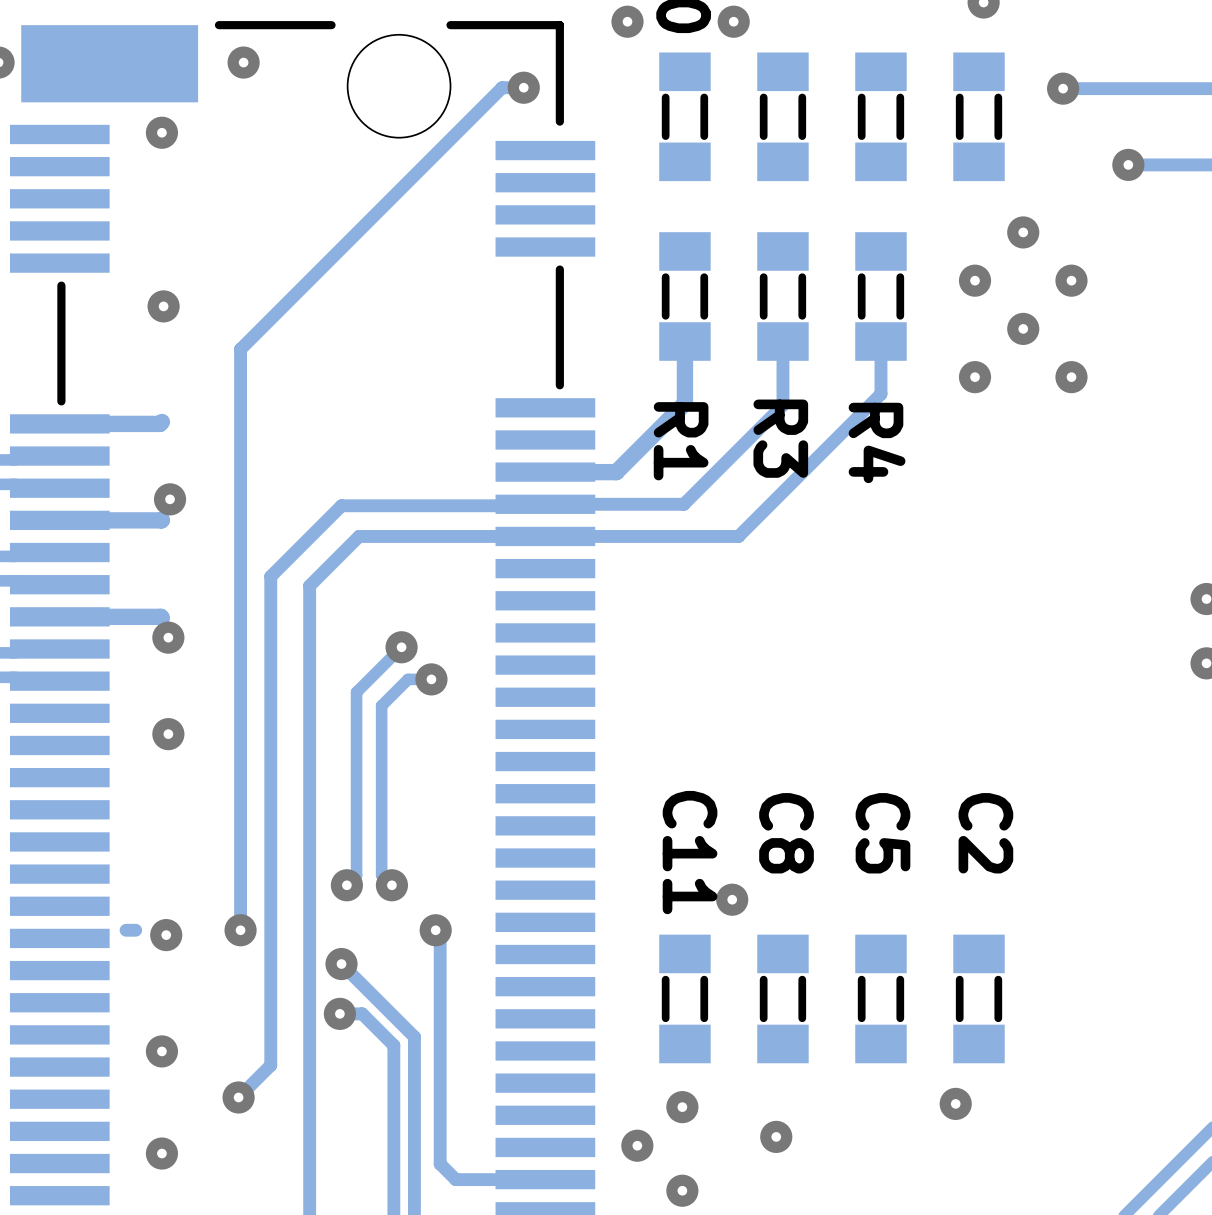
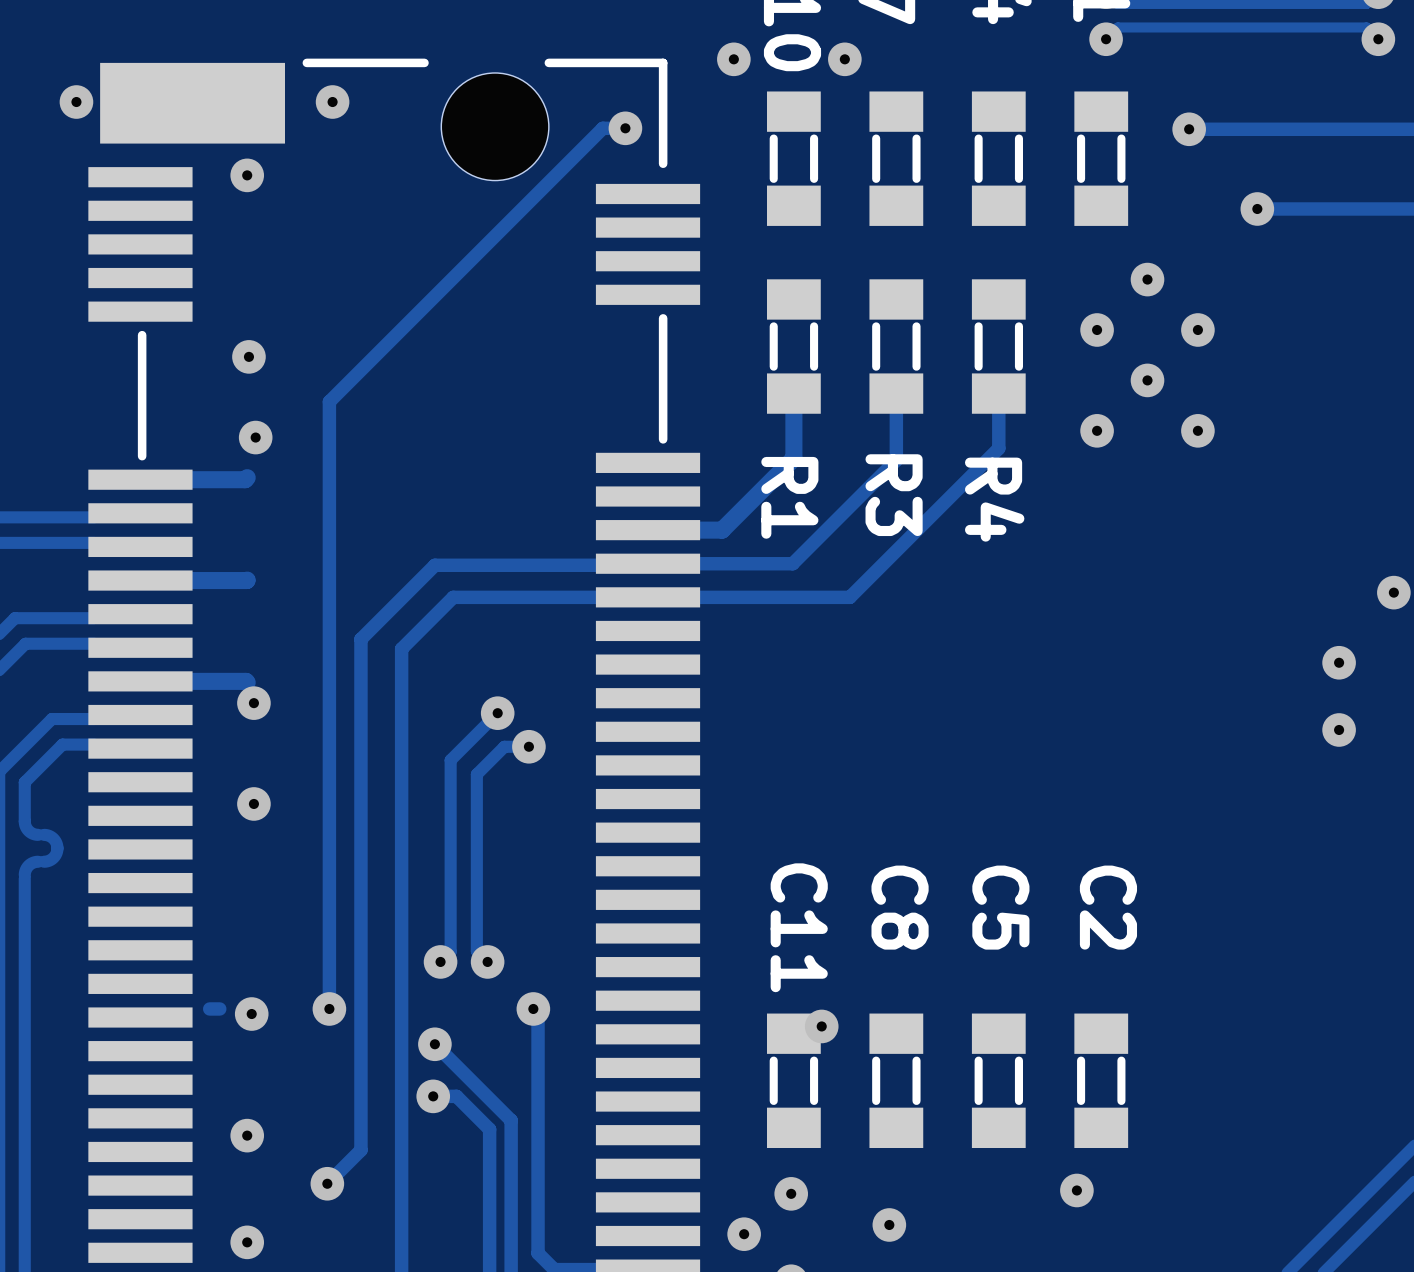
via position: (170, 499) -> (255, 437)
via position: (732, 899) -> (821, 1026)

